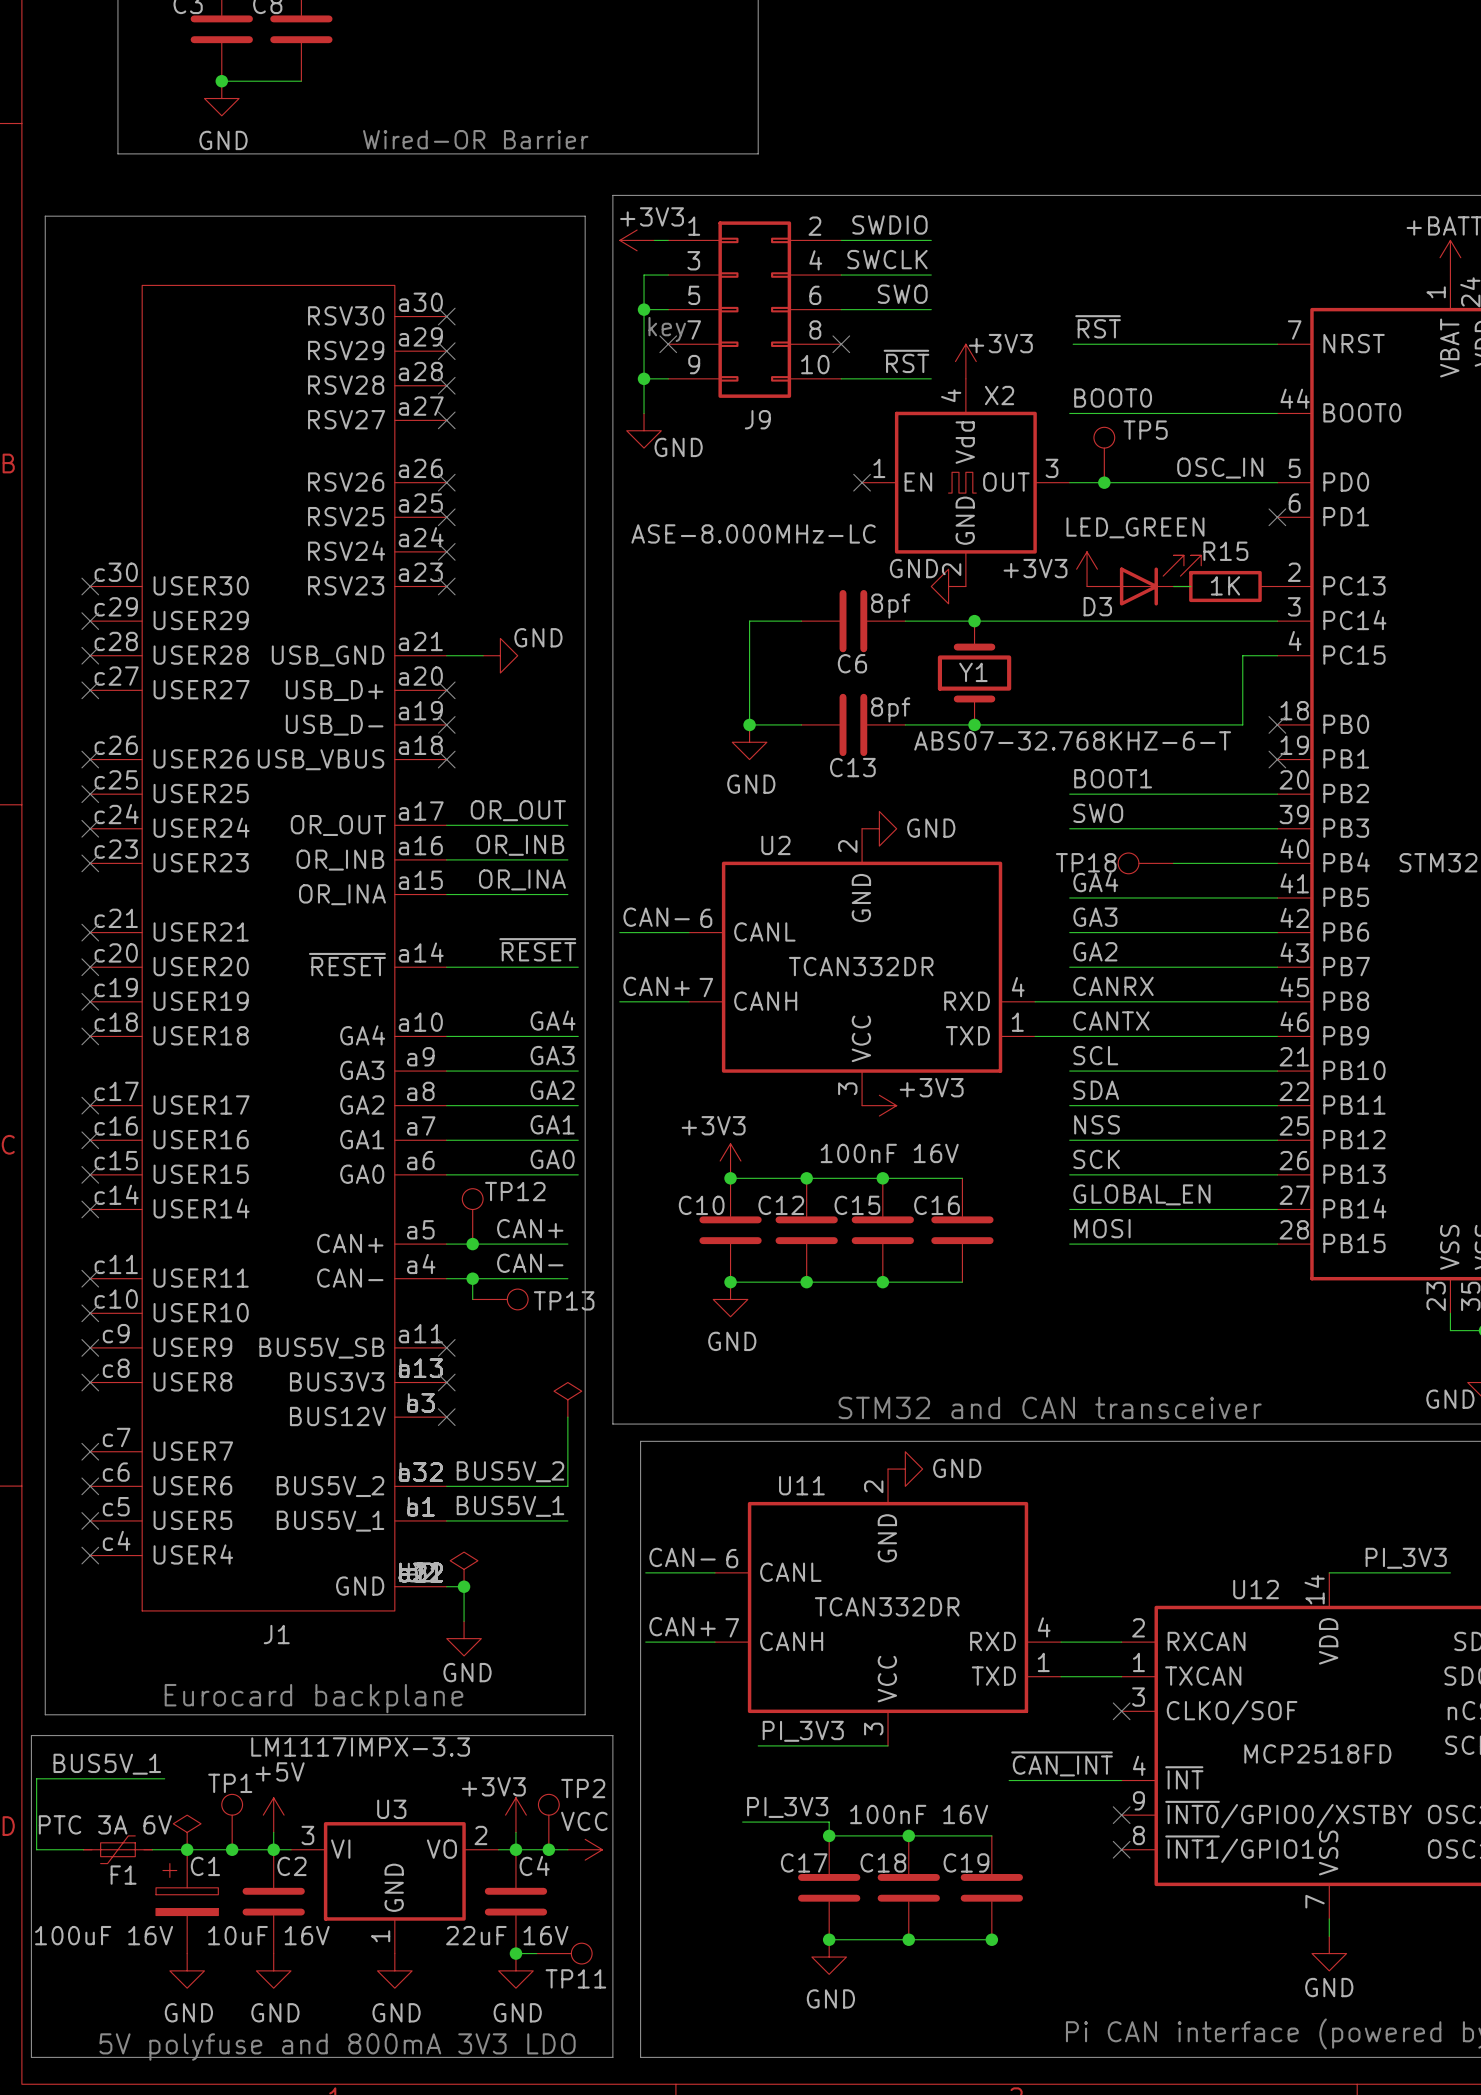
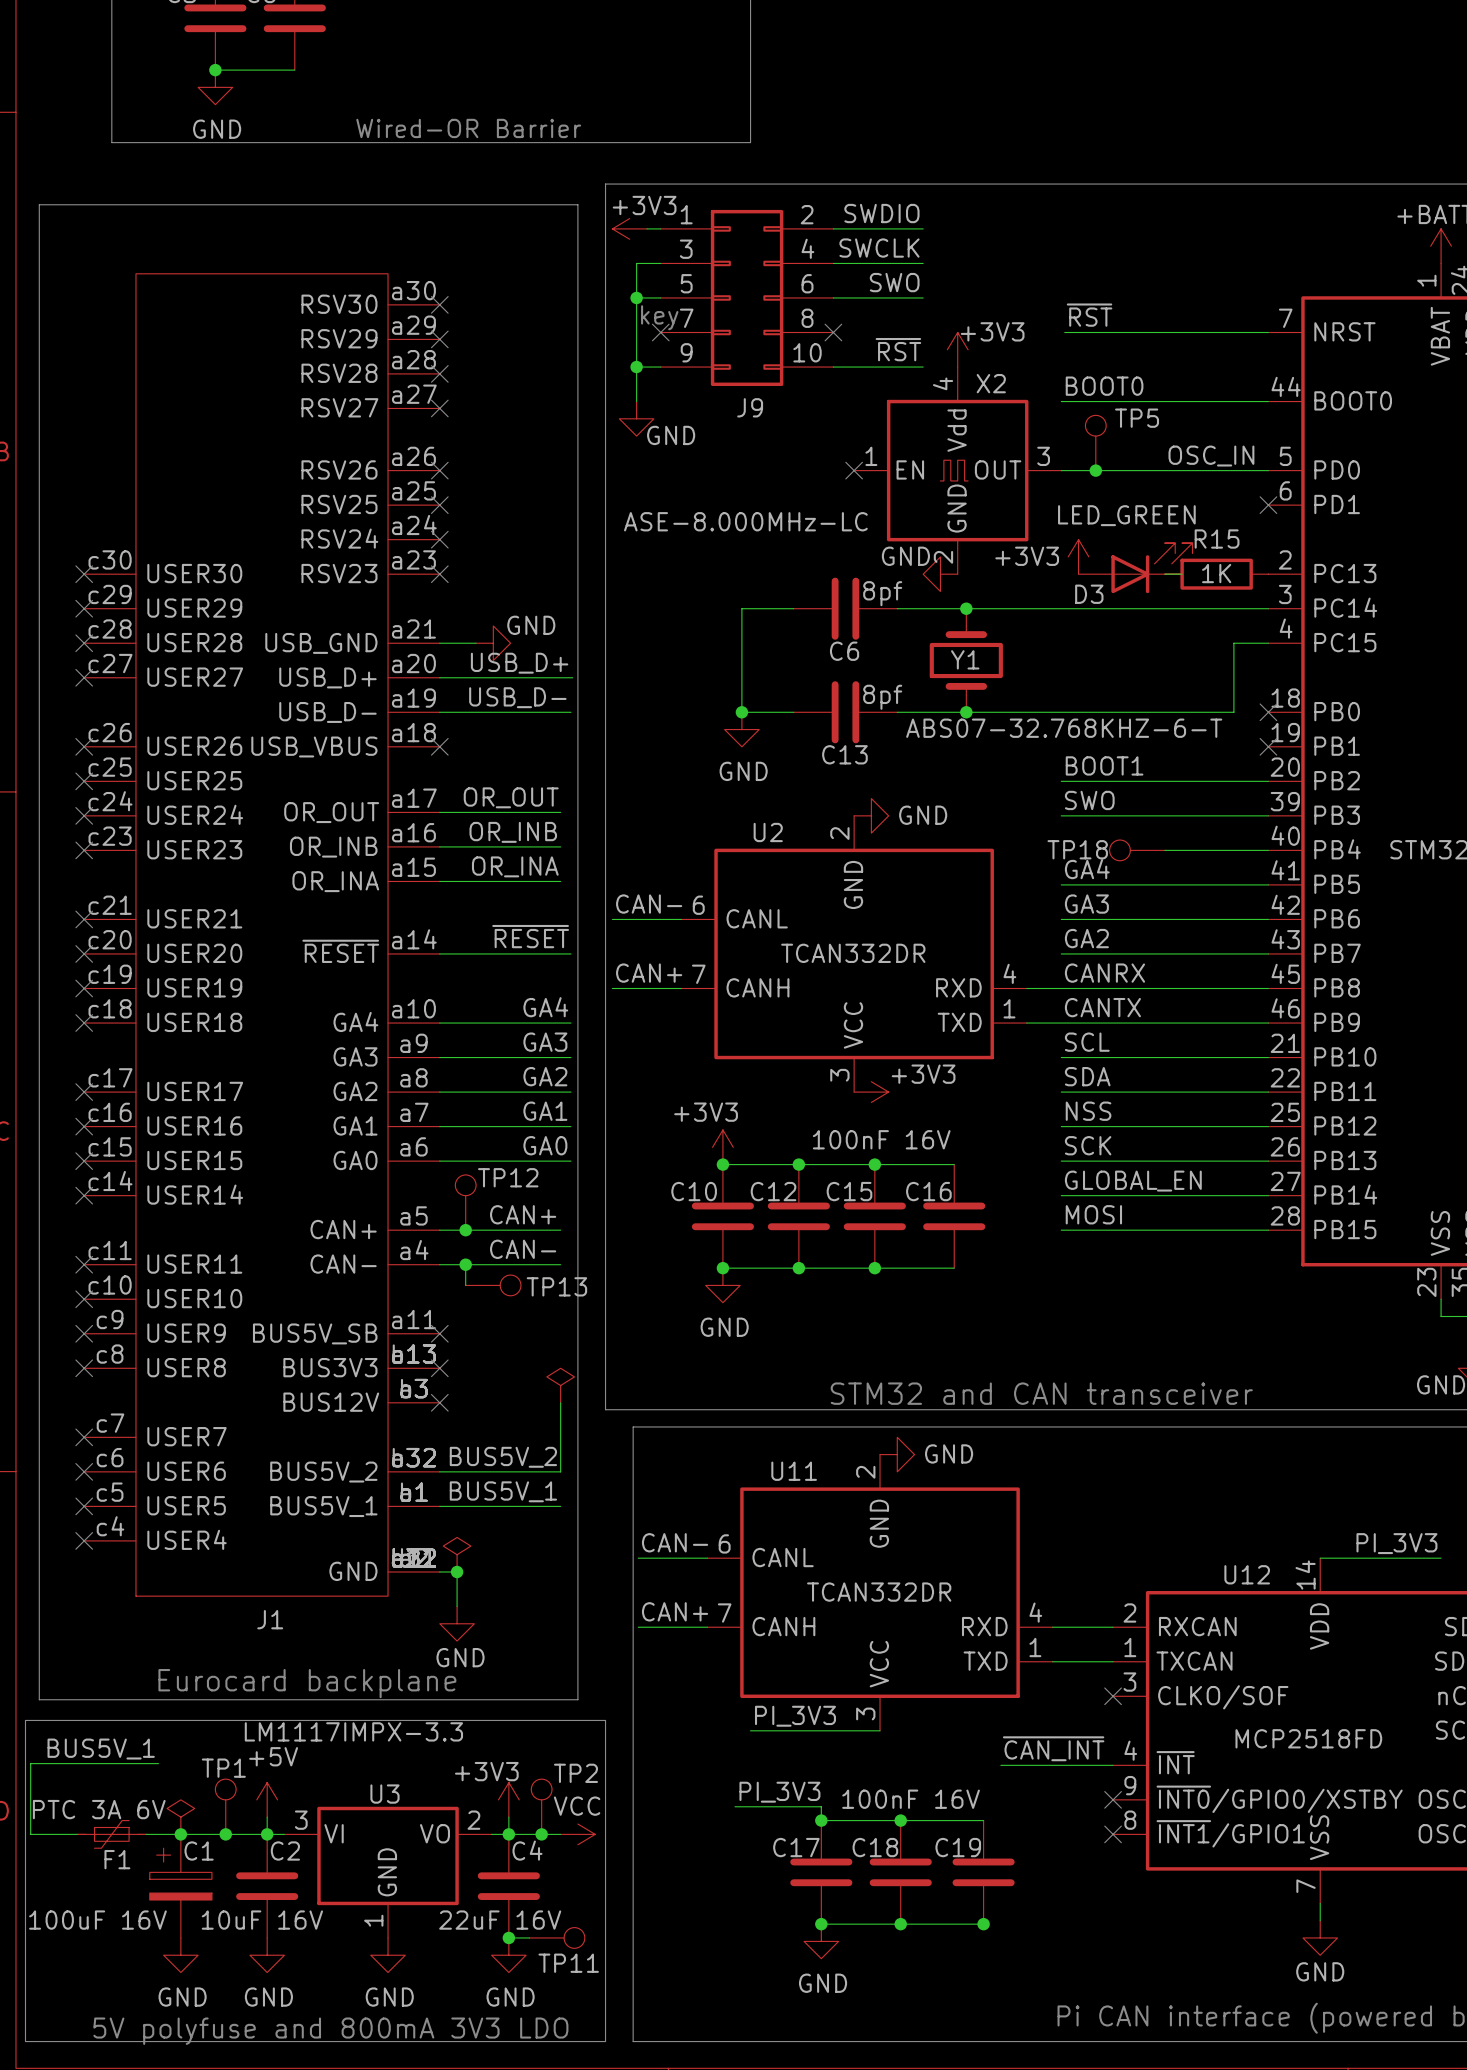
label: none -> USB_D+ (519, 663)
wire: none -> (439, 677) (572, 677)
no-connect mark: (446, 690) -> none
label: none -> USB_D- (517, 697)
wire: none -> (439, 712) (571, 712)
no-connect mark: (446, 724) -> none

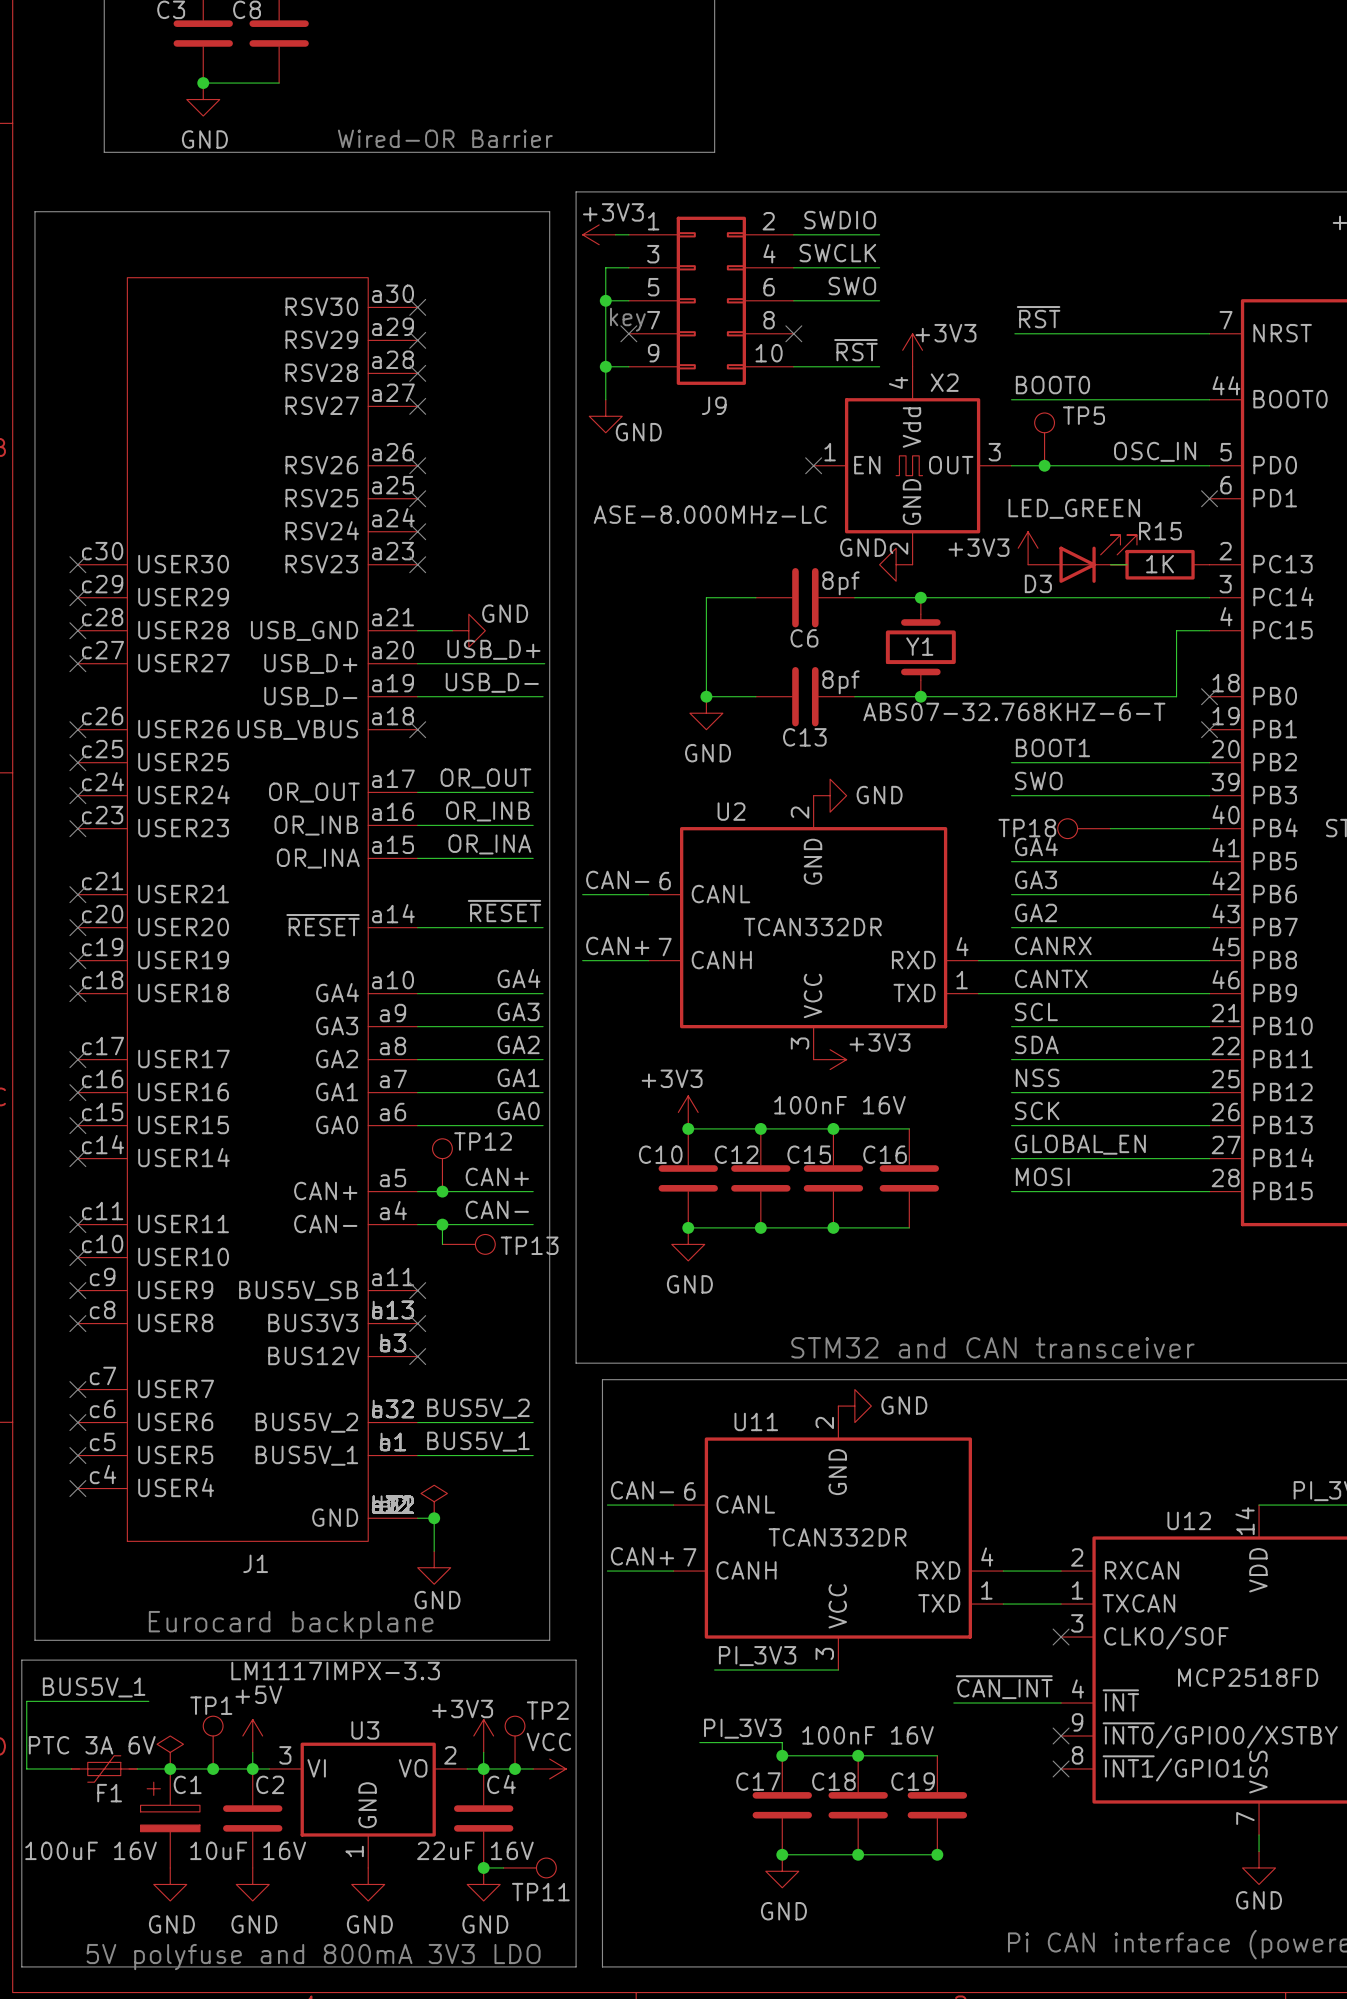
power symbol: (560, 1385) -> none
wire: (560, 1402) (560, 1471) -> none

